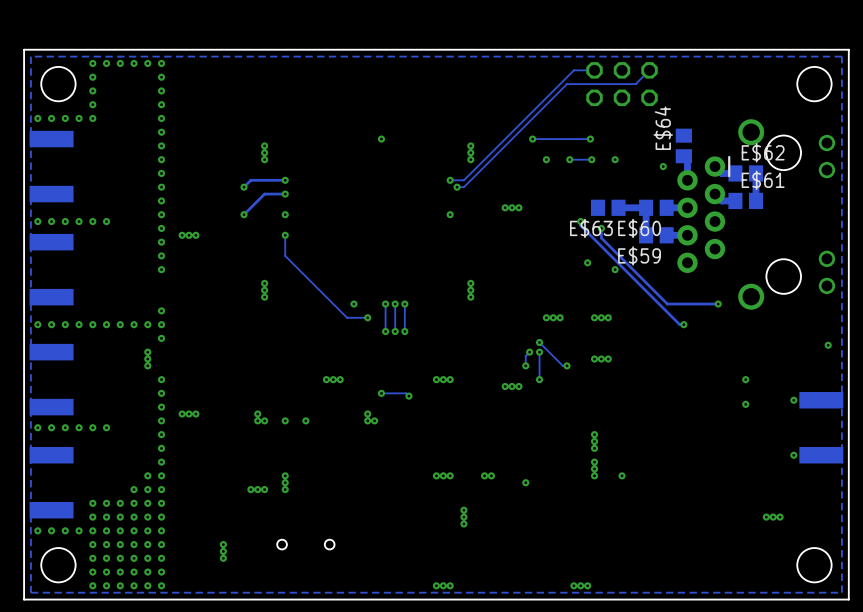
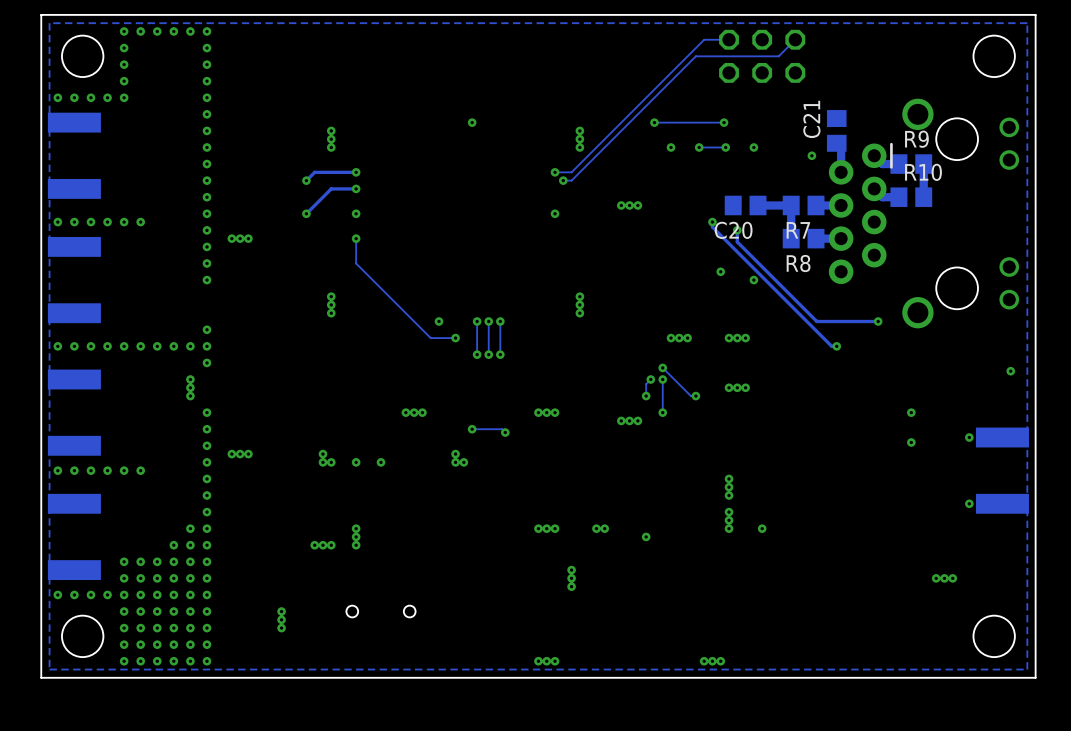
E$64 name: E$64 (663, 128) -> C21 (811, 119)
E$62 name: E$62 (763, 152) -> R9 (916, 139)
E$61 name: E$61 (763, 180) -> R10 (923, 172)
E$63 name: E$63 (591, 228) -> C20 (733, 230)
E$60 name: E$60 (639, 228) -> R7 (798, 230)
E$59 name: E$59 (639, 255) -> R8 (798, 263)

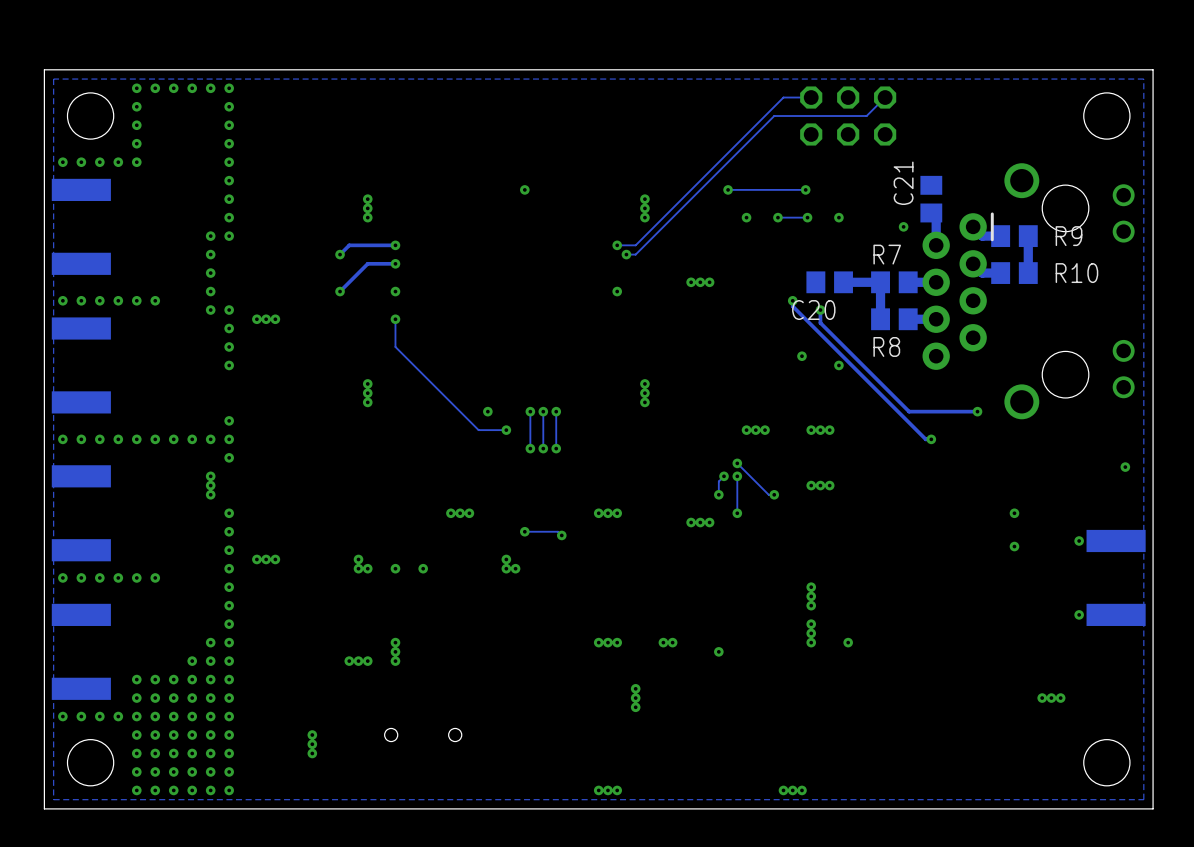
R9 name position: R9 (916, 139) -> R9 (1069, 236)
via: none -> (210, 236)
R10 name position: R10 (923, 172) -> R10 (1076, 273)
via: none -> (210, 254)
via: (206, 180) -> none
via: none -> (210, 273)
via: (206, 197) -> none
via: none -> (210, 291)
via: (206, 213) -> none
via: none -> (210, 310)
R7 name position: R7 (798, 230) -> R7 (887, 254)

